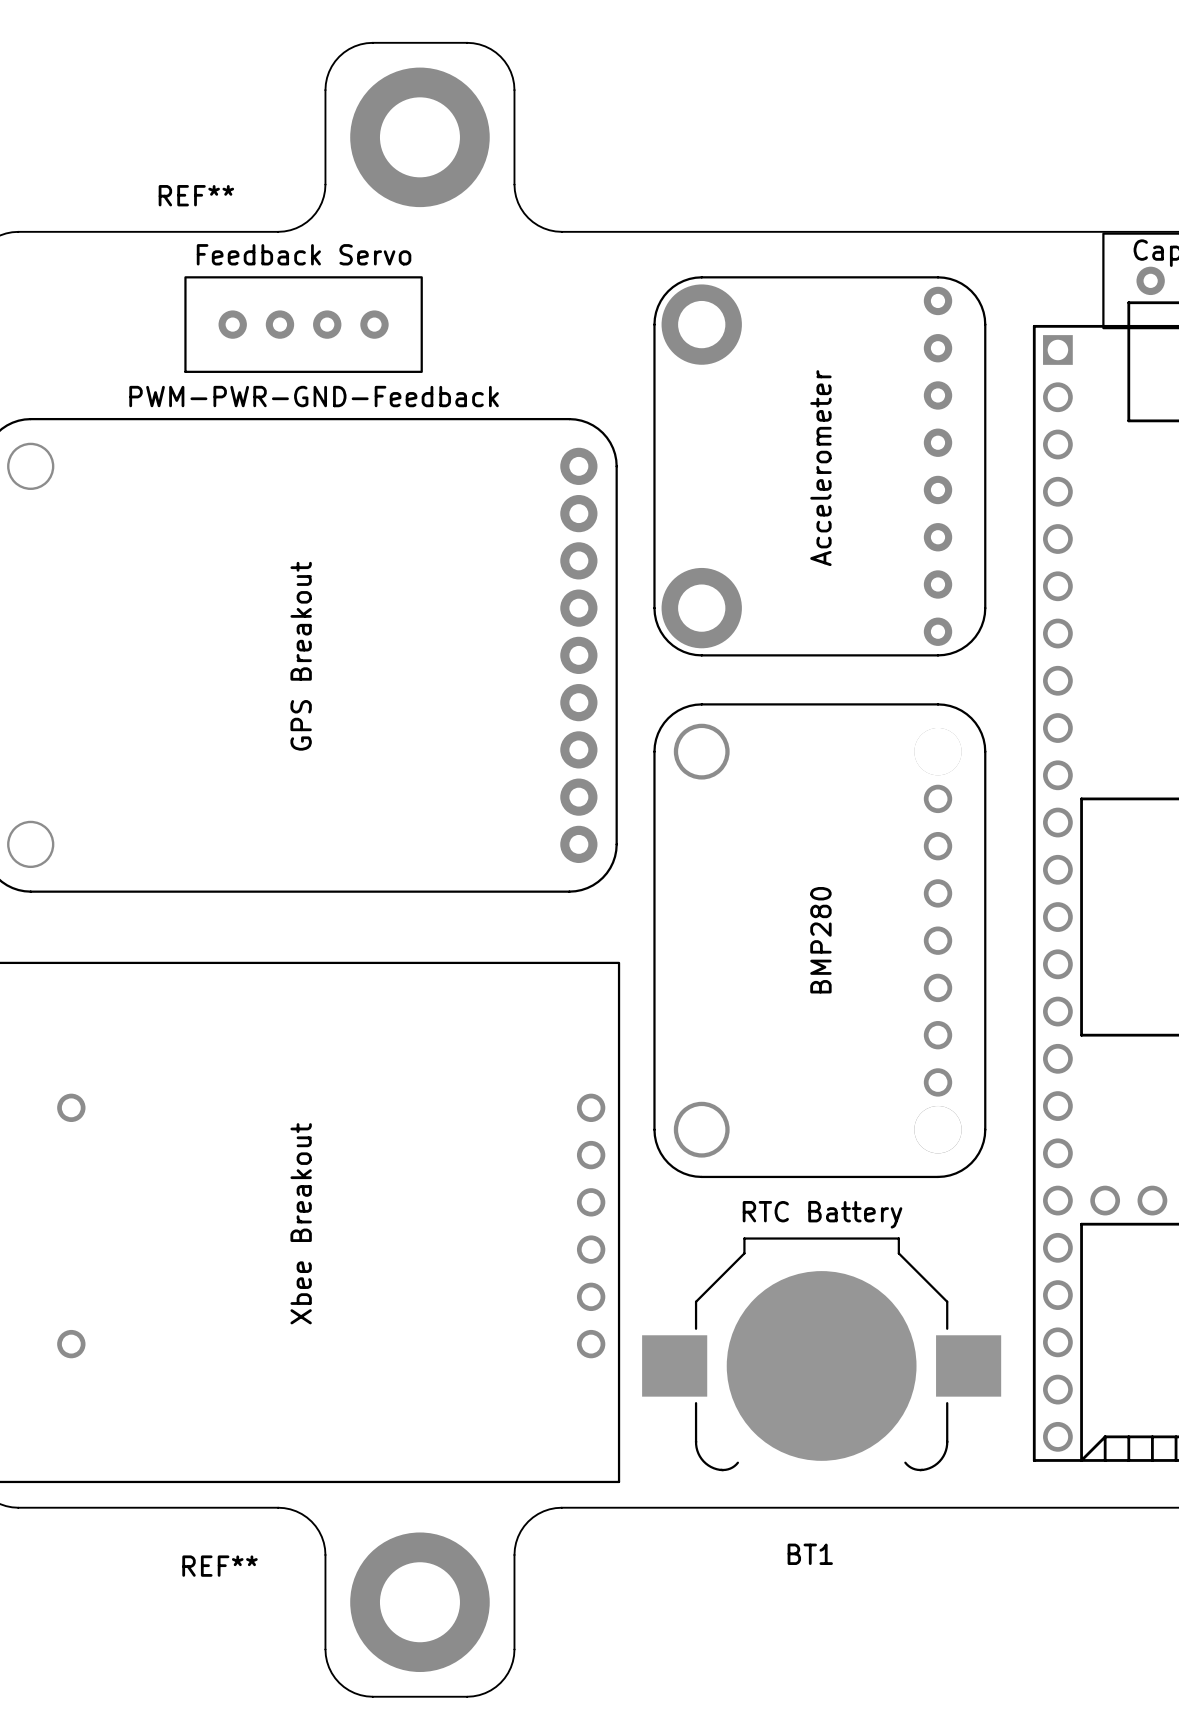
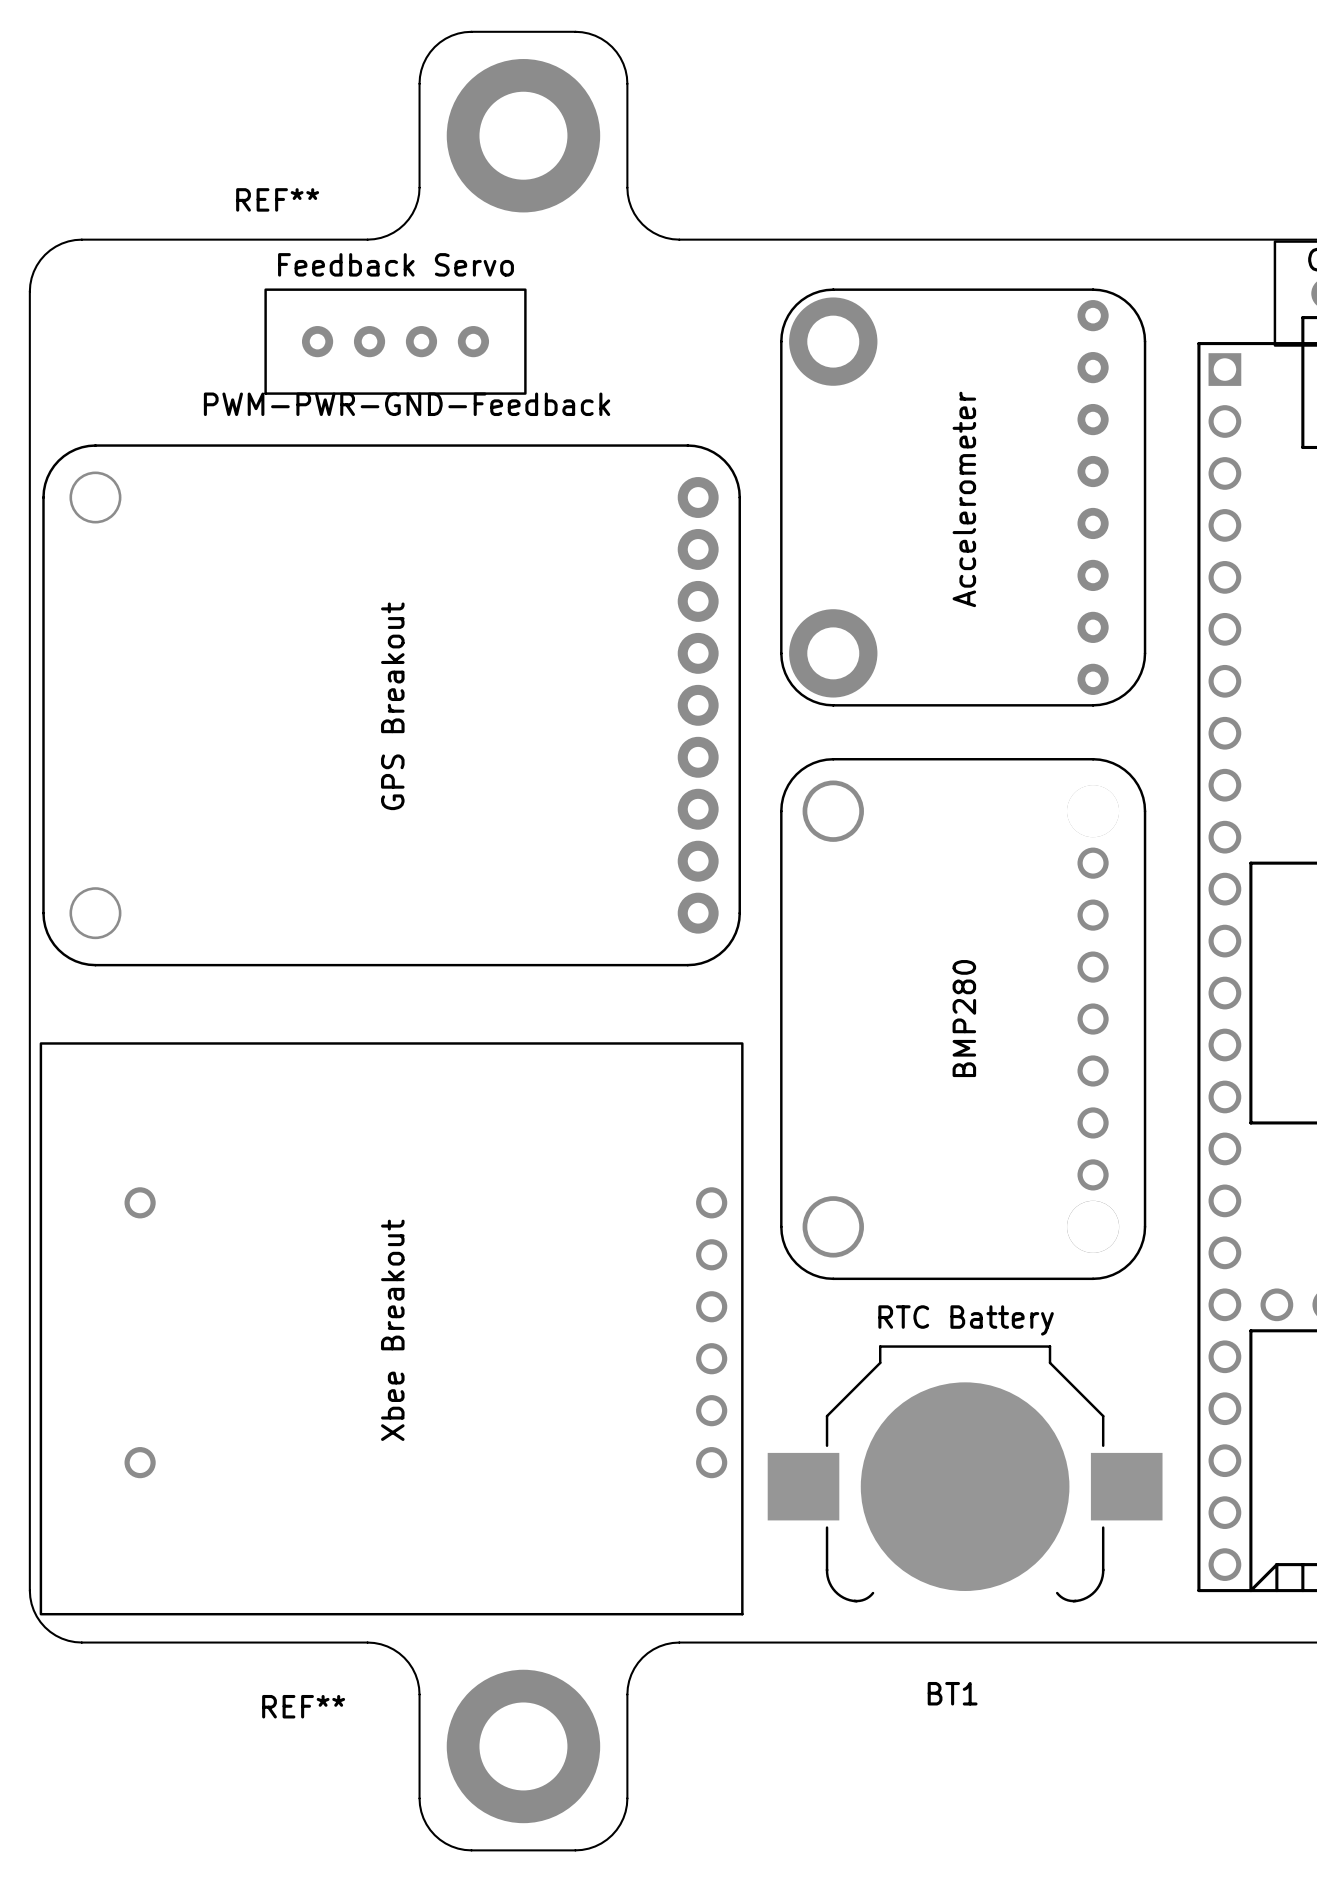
text position: PWM-PWR-GND-Feedback (314, 396) -> PWM-PWR-GND-Feedback (407, 404)

